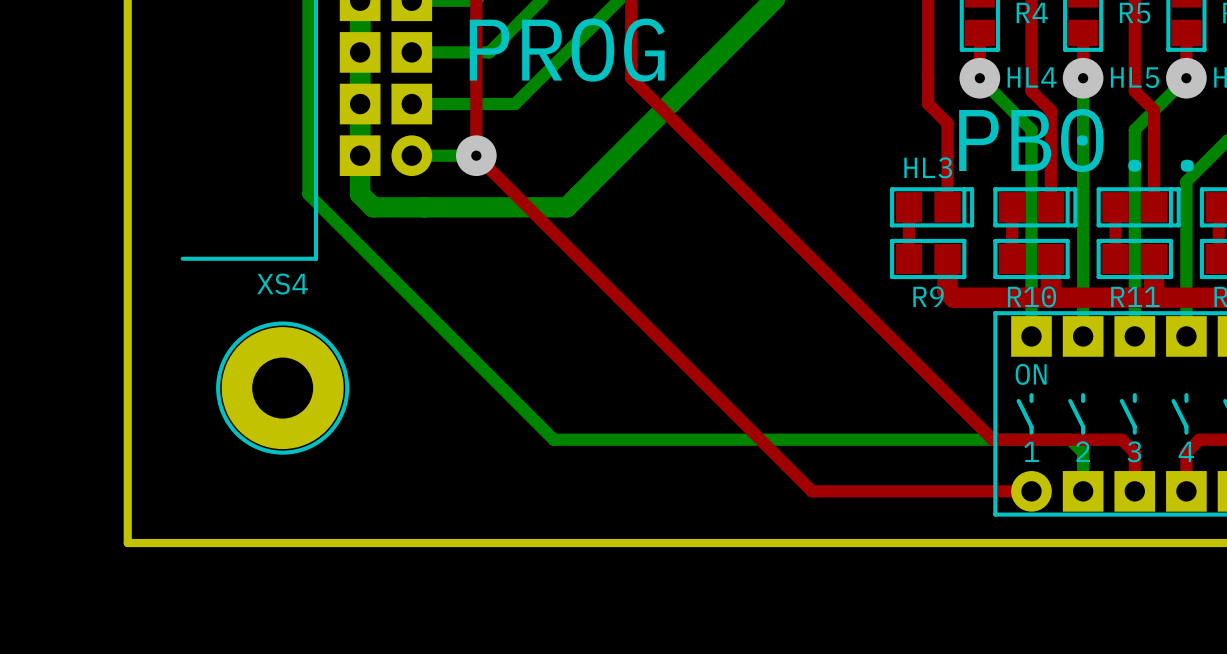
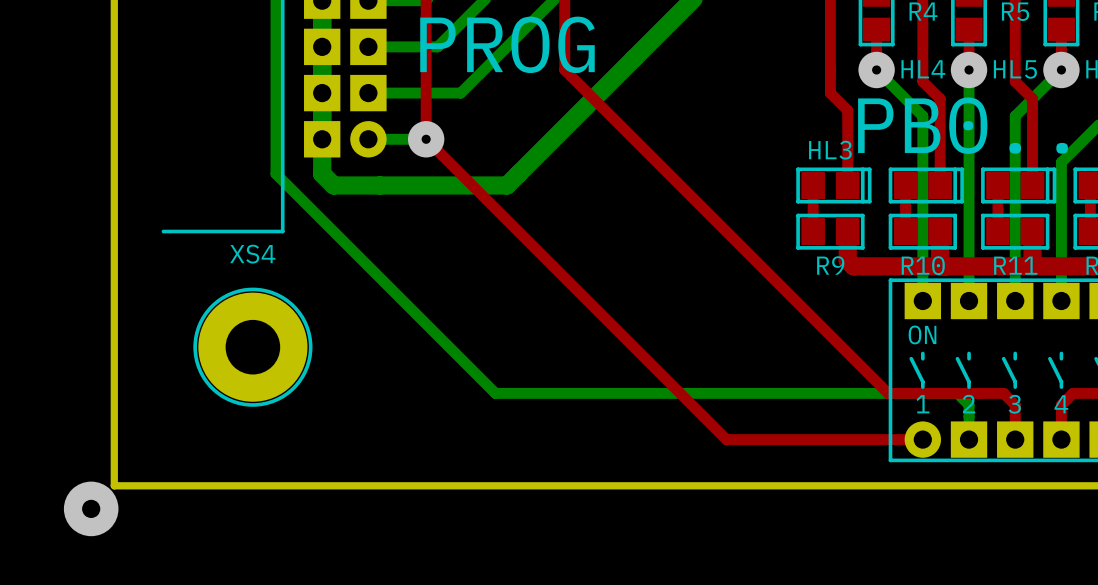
via: none -> (91, 508)

